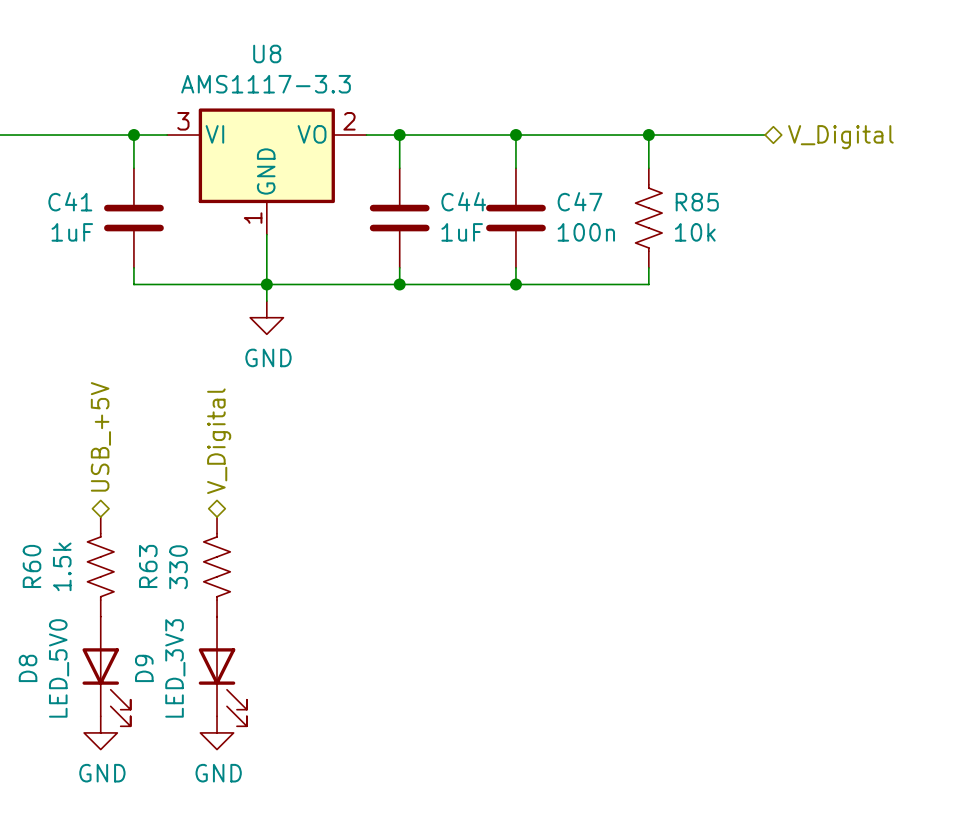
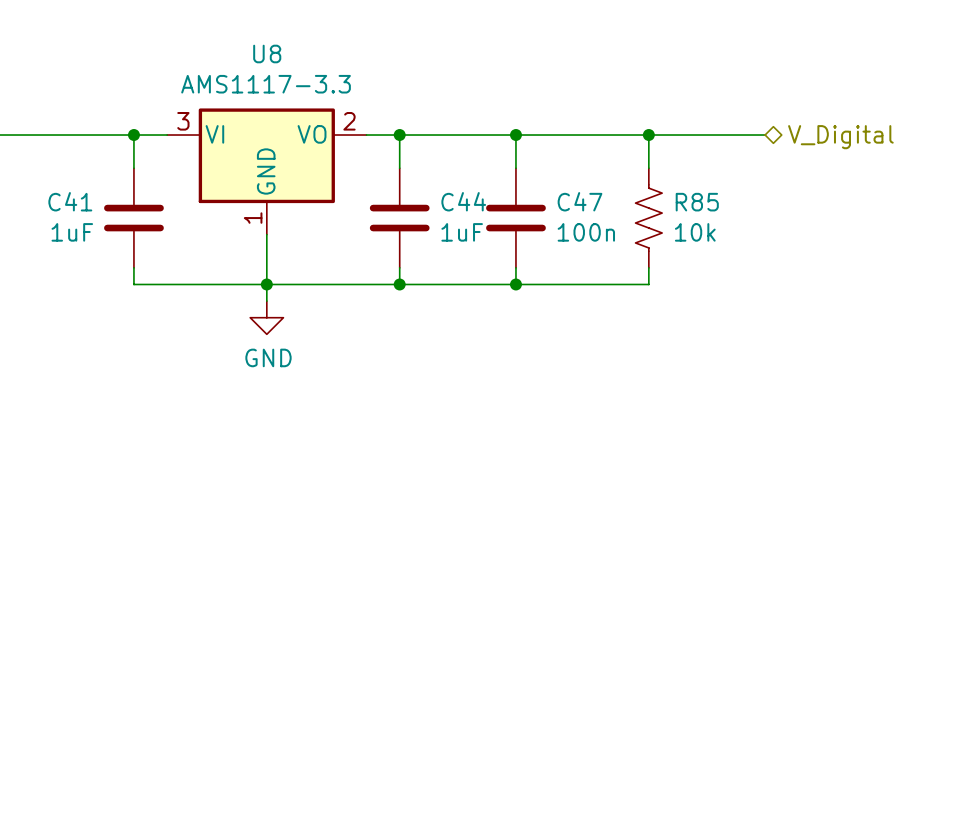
hierarchical label: USB_+5V (100, 436) -> none
hierarchical label: V_Digital (219, 441) -> none
R60: 1.5k (100, 566) -> none
R63: 330 (217, 566) -> none
D8: LED_5V0 (106, 671) -> none
D9: LED_3V3 (222, 671) -> none
power symbol: GND (100, 732) -> none
power symbol: GND (217, 732) -> none

